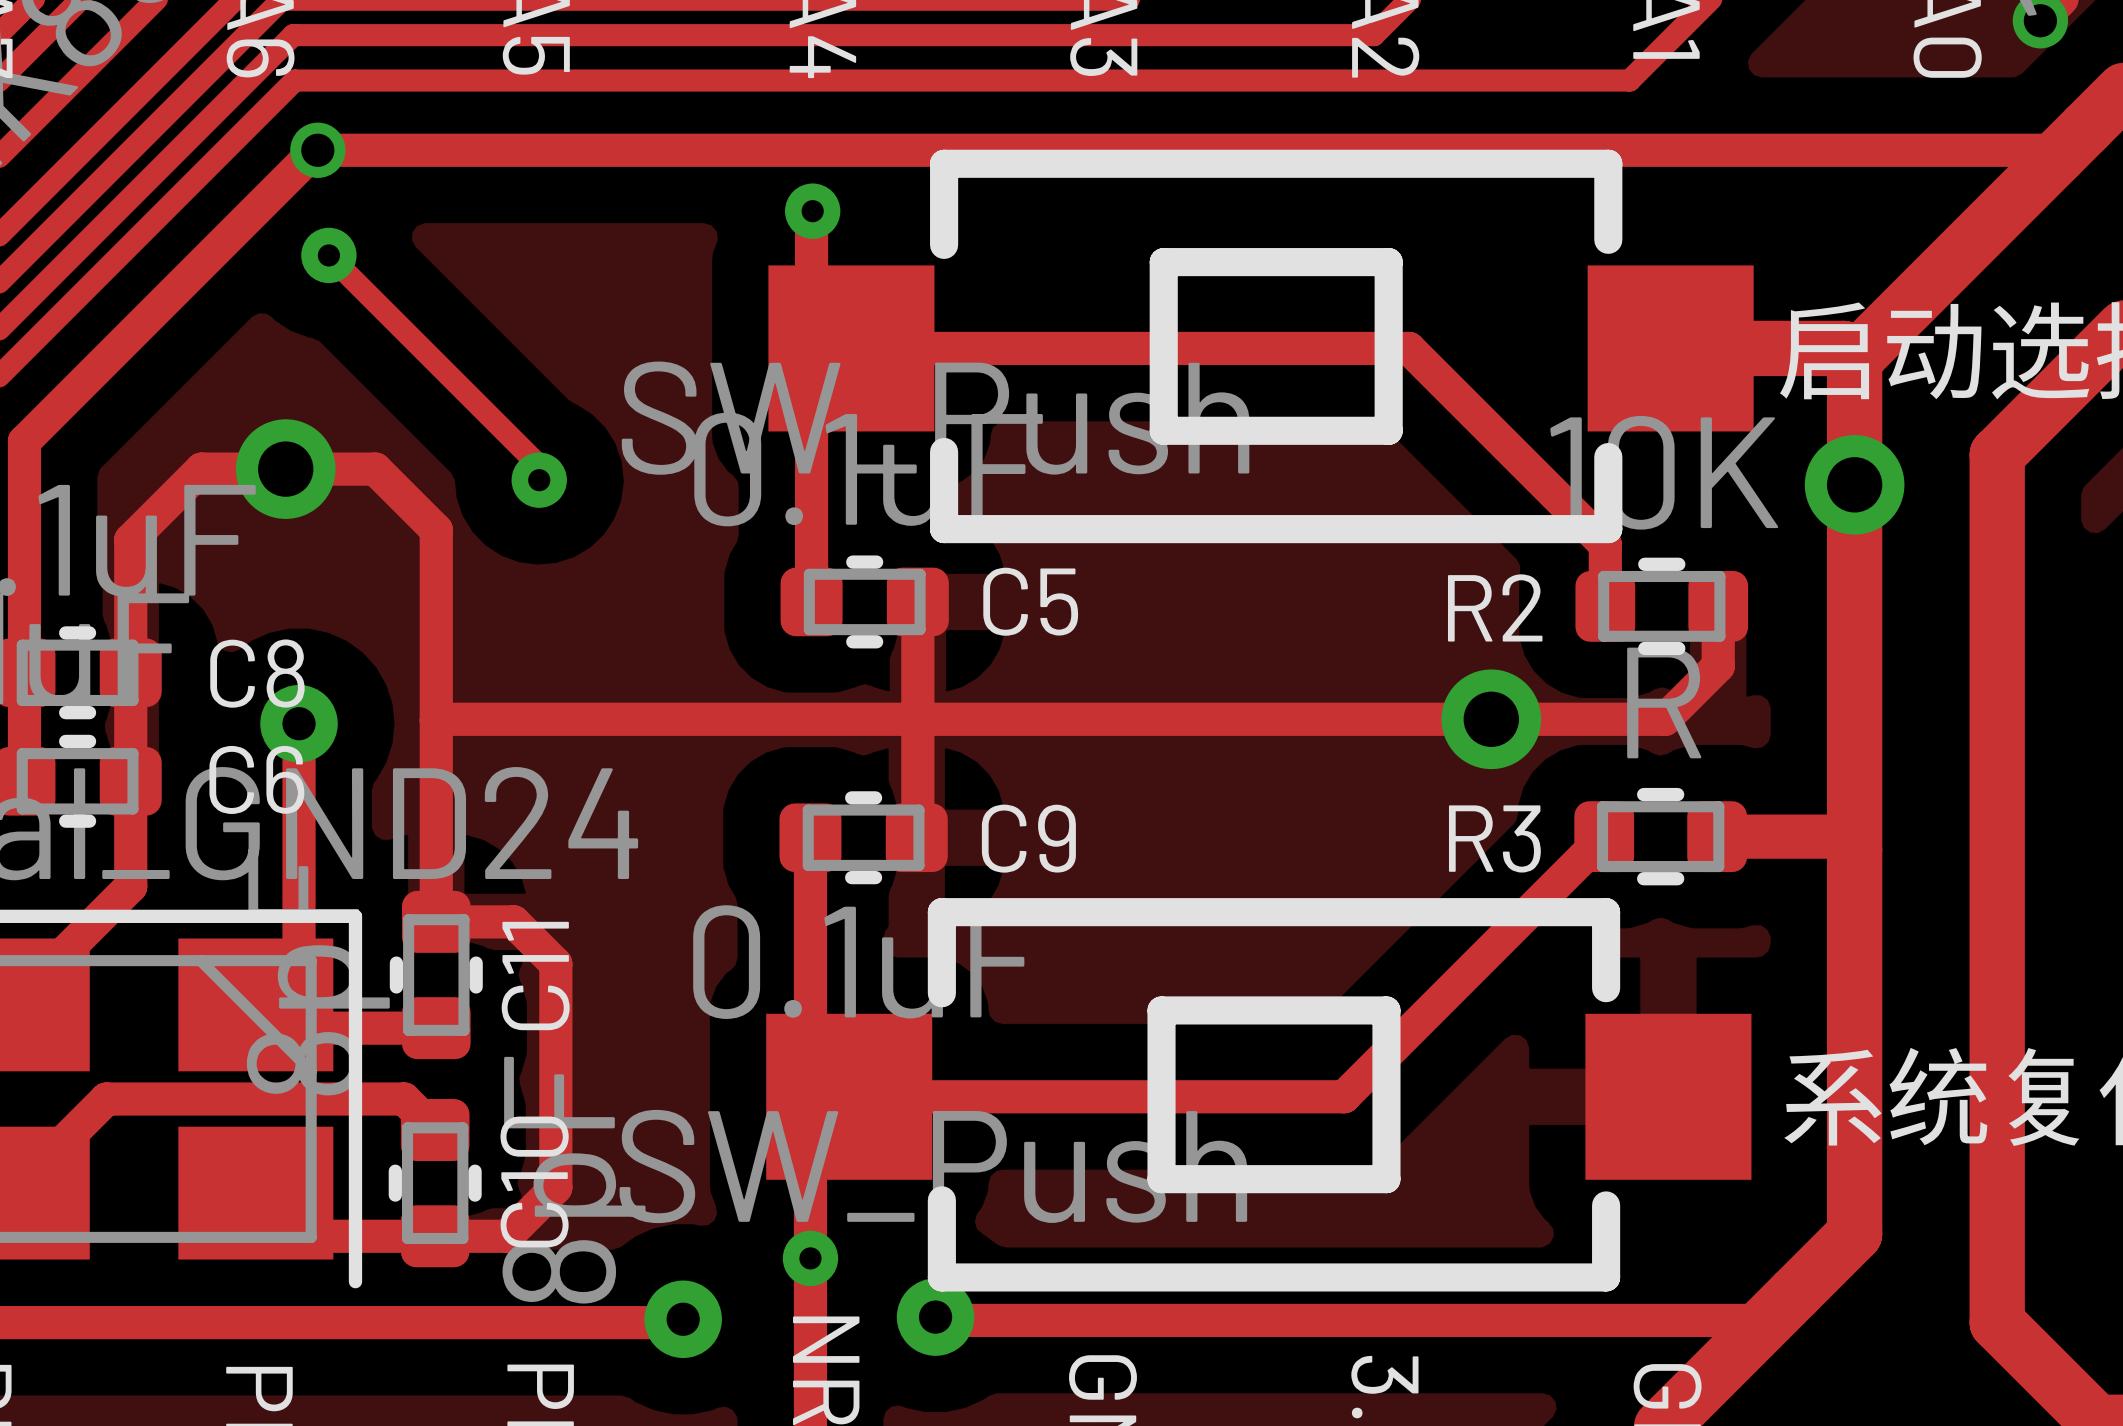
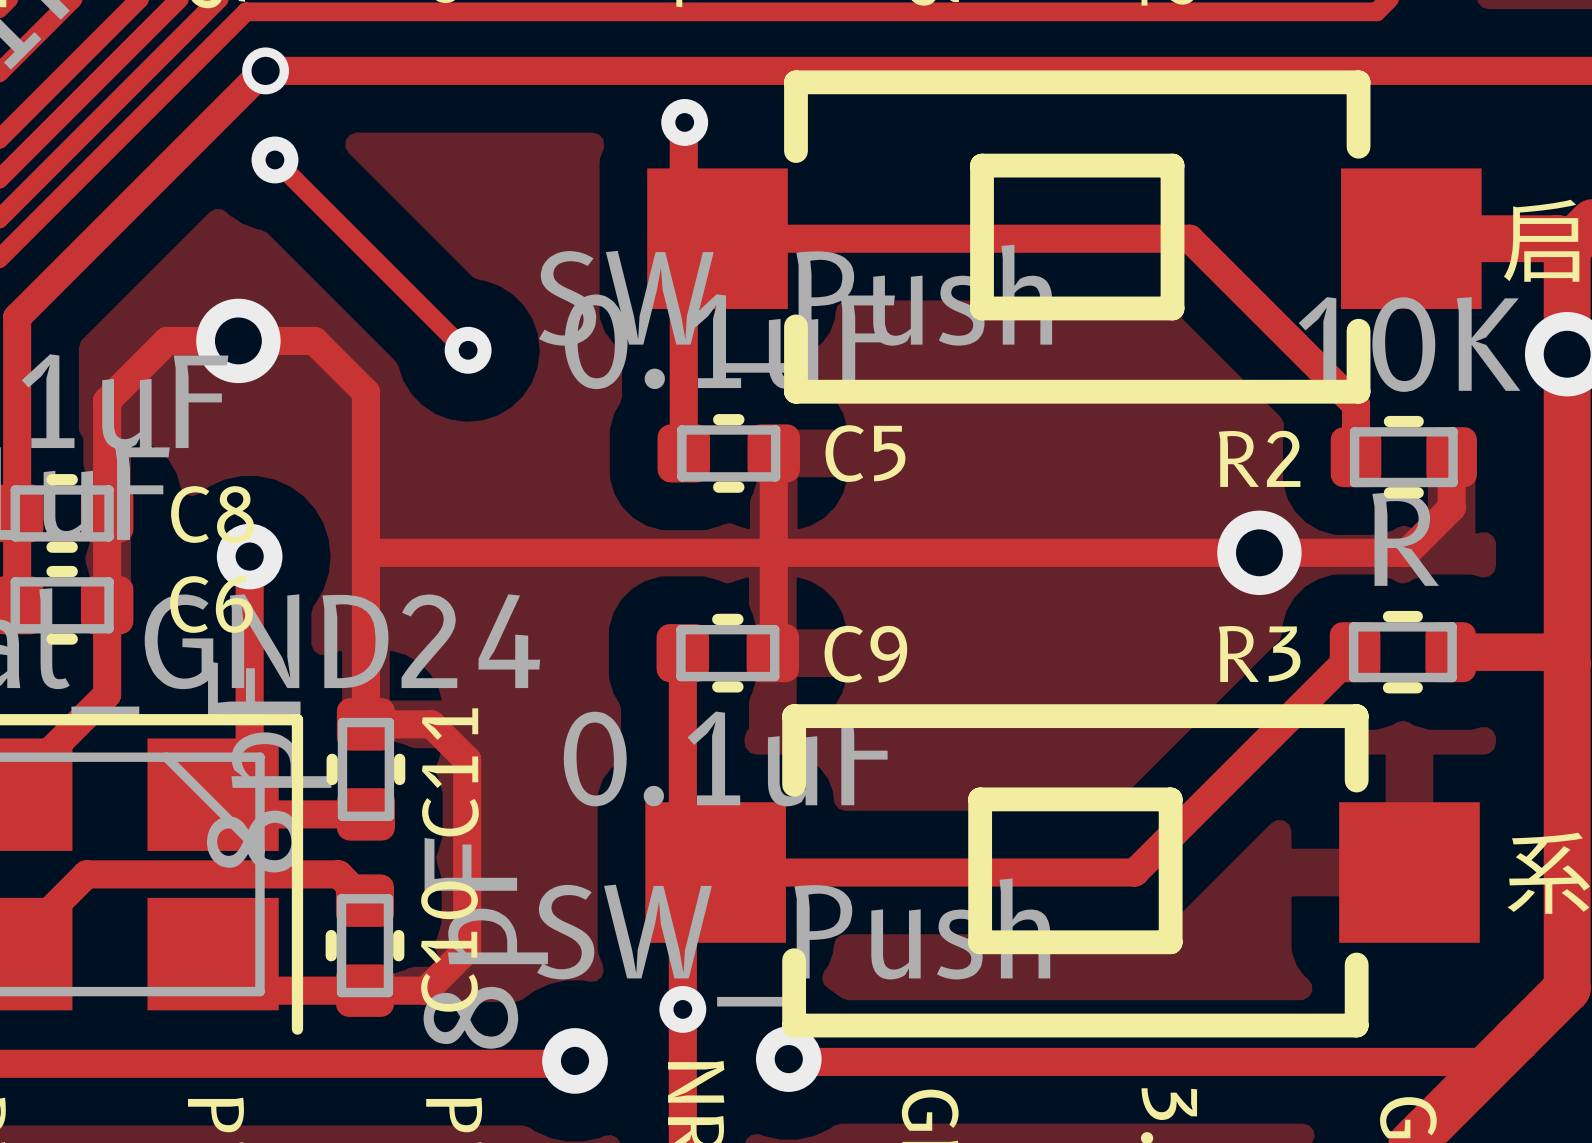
via position: (539, 480) -> (468, 350)

